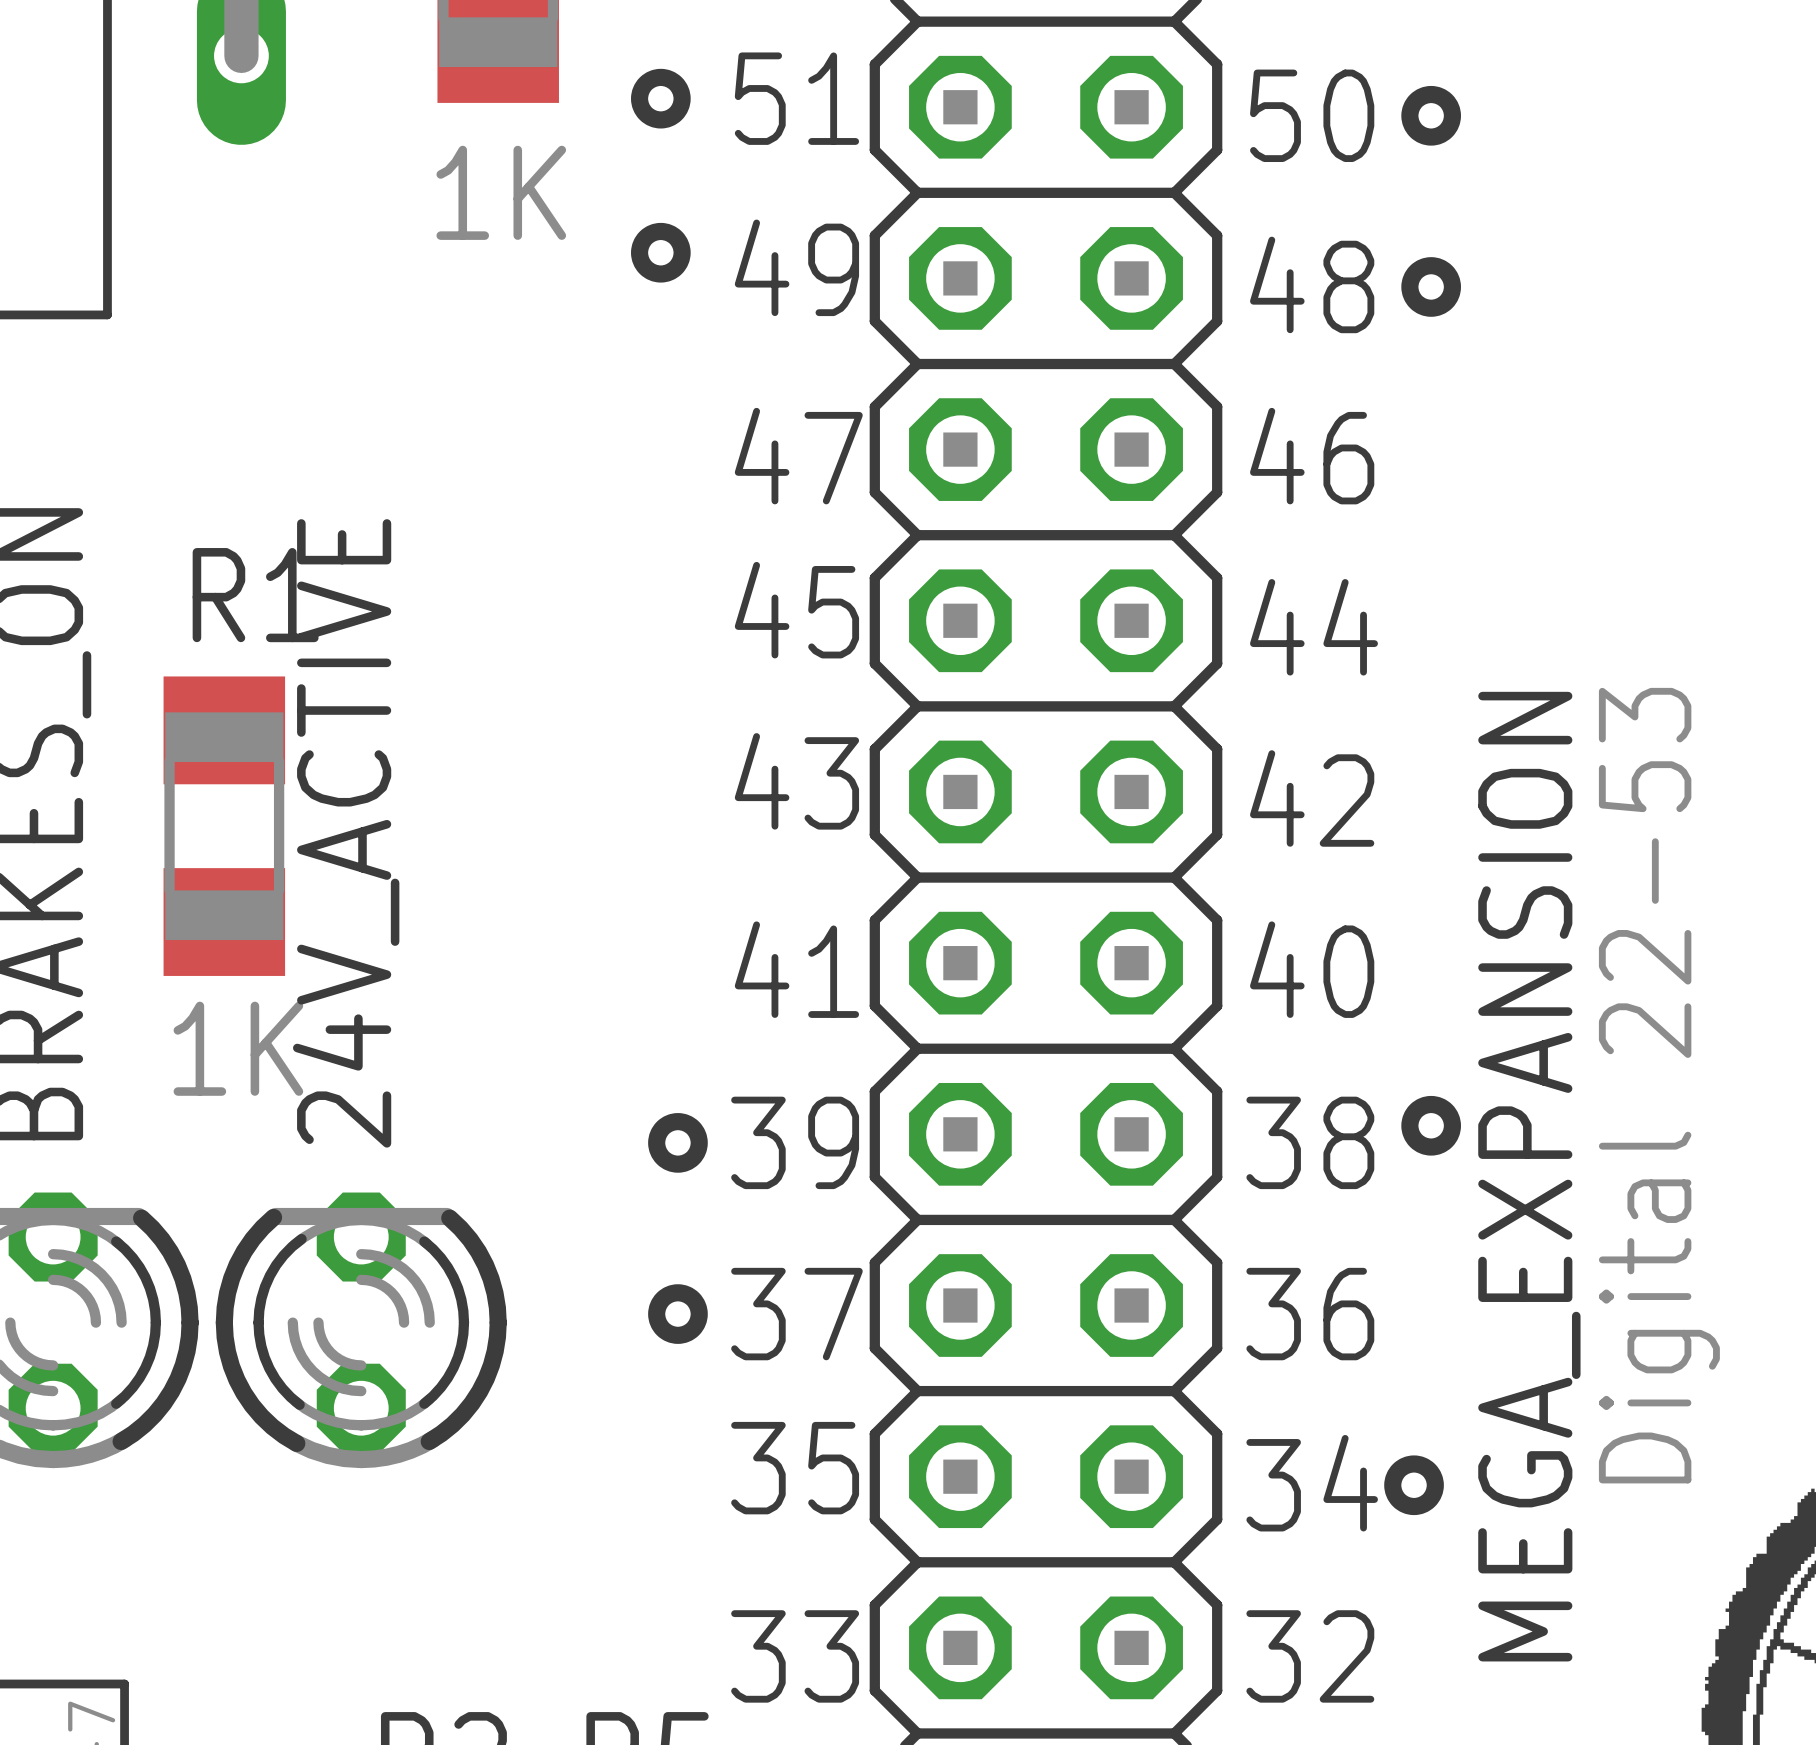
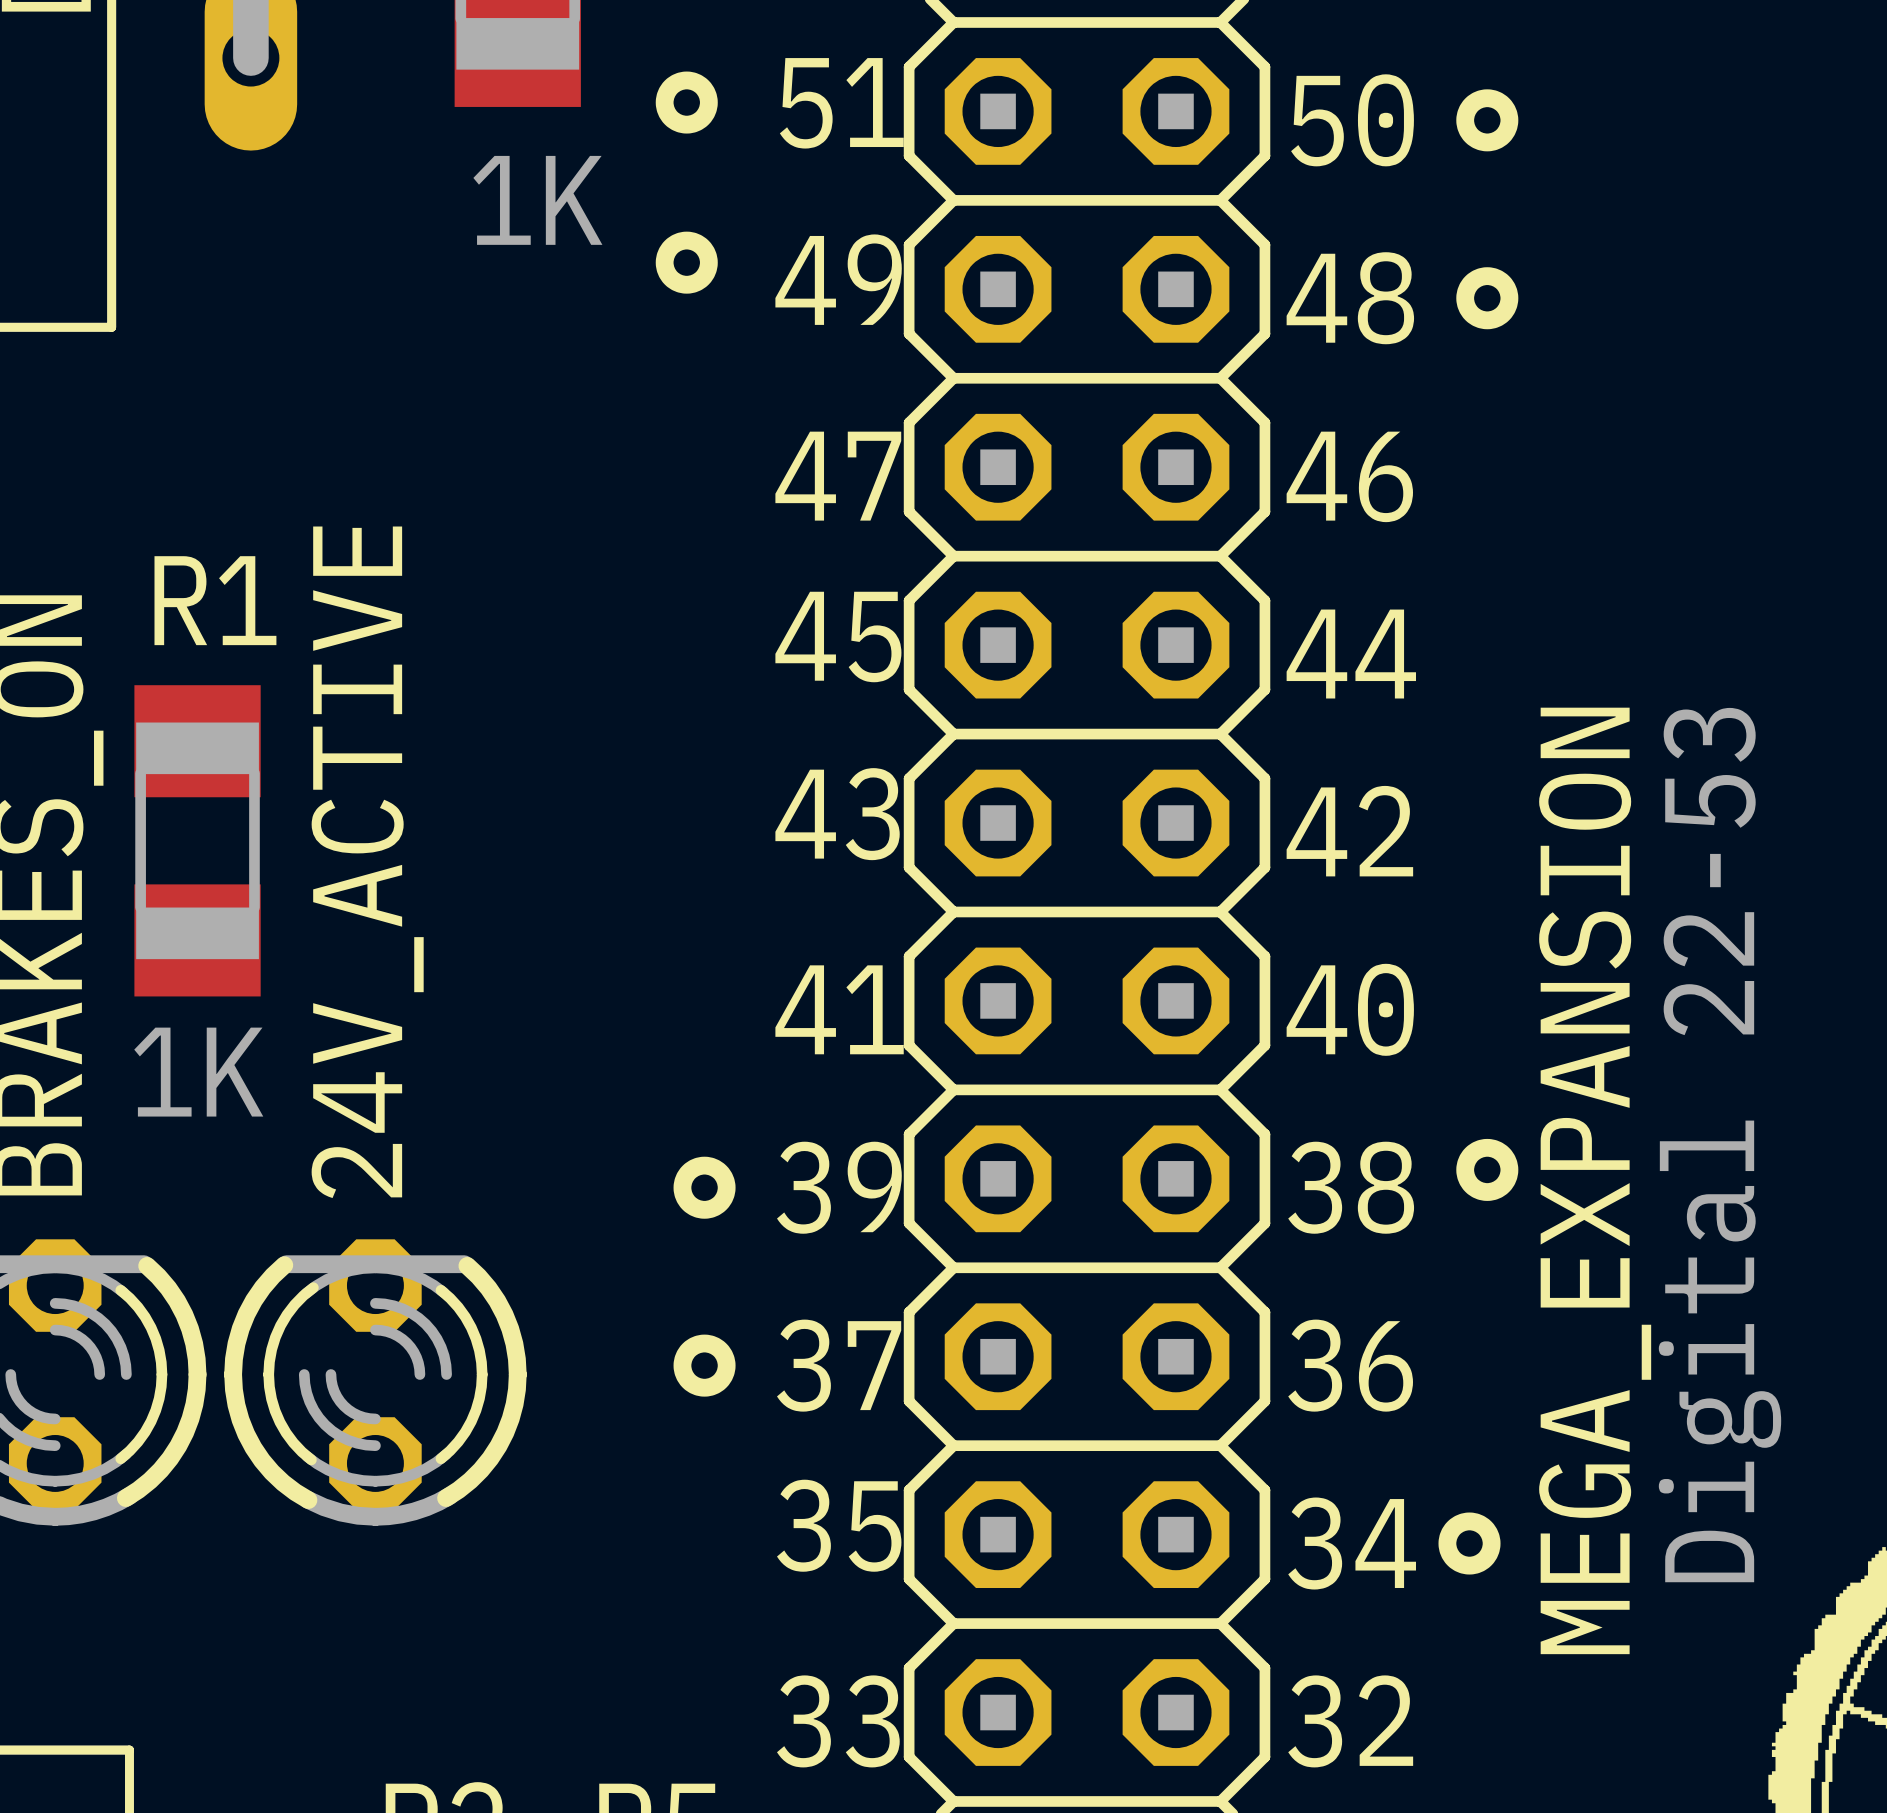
R1 position: (224, 826) -> (197, 840)

